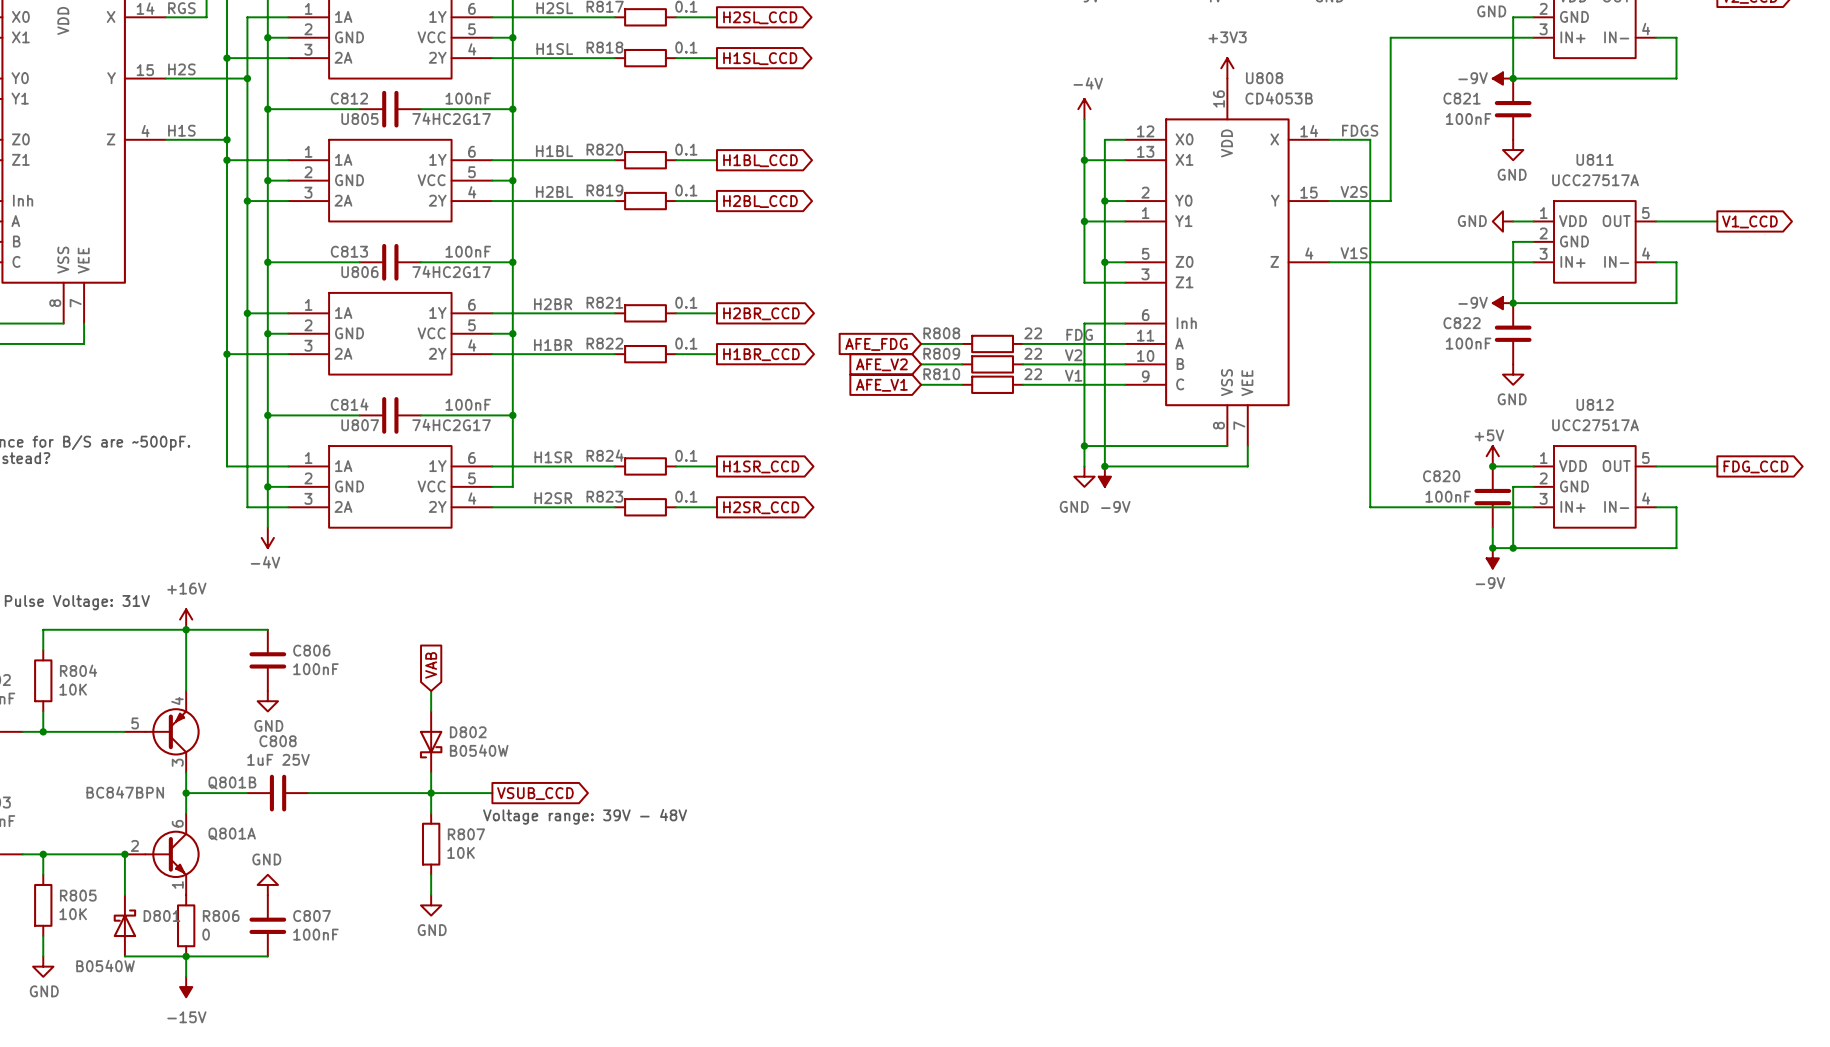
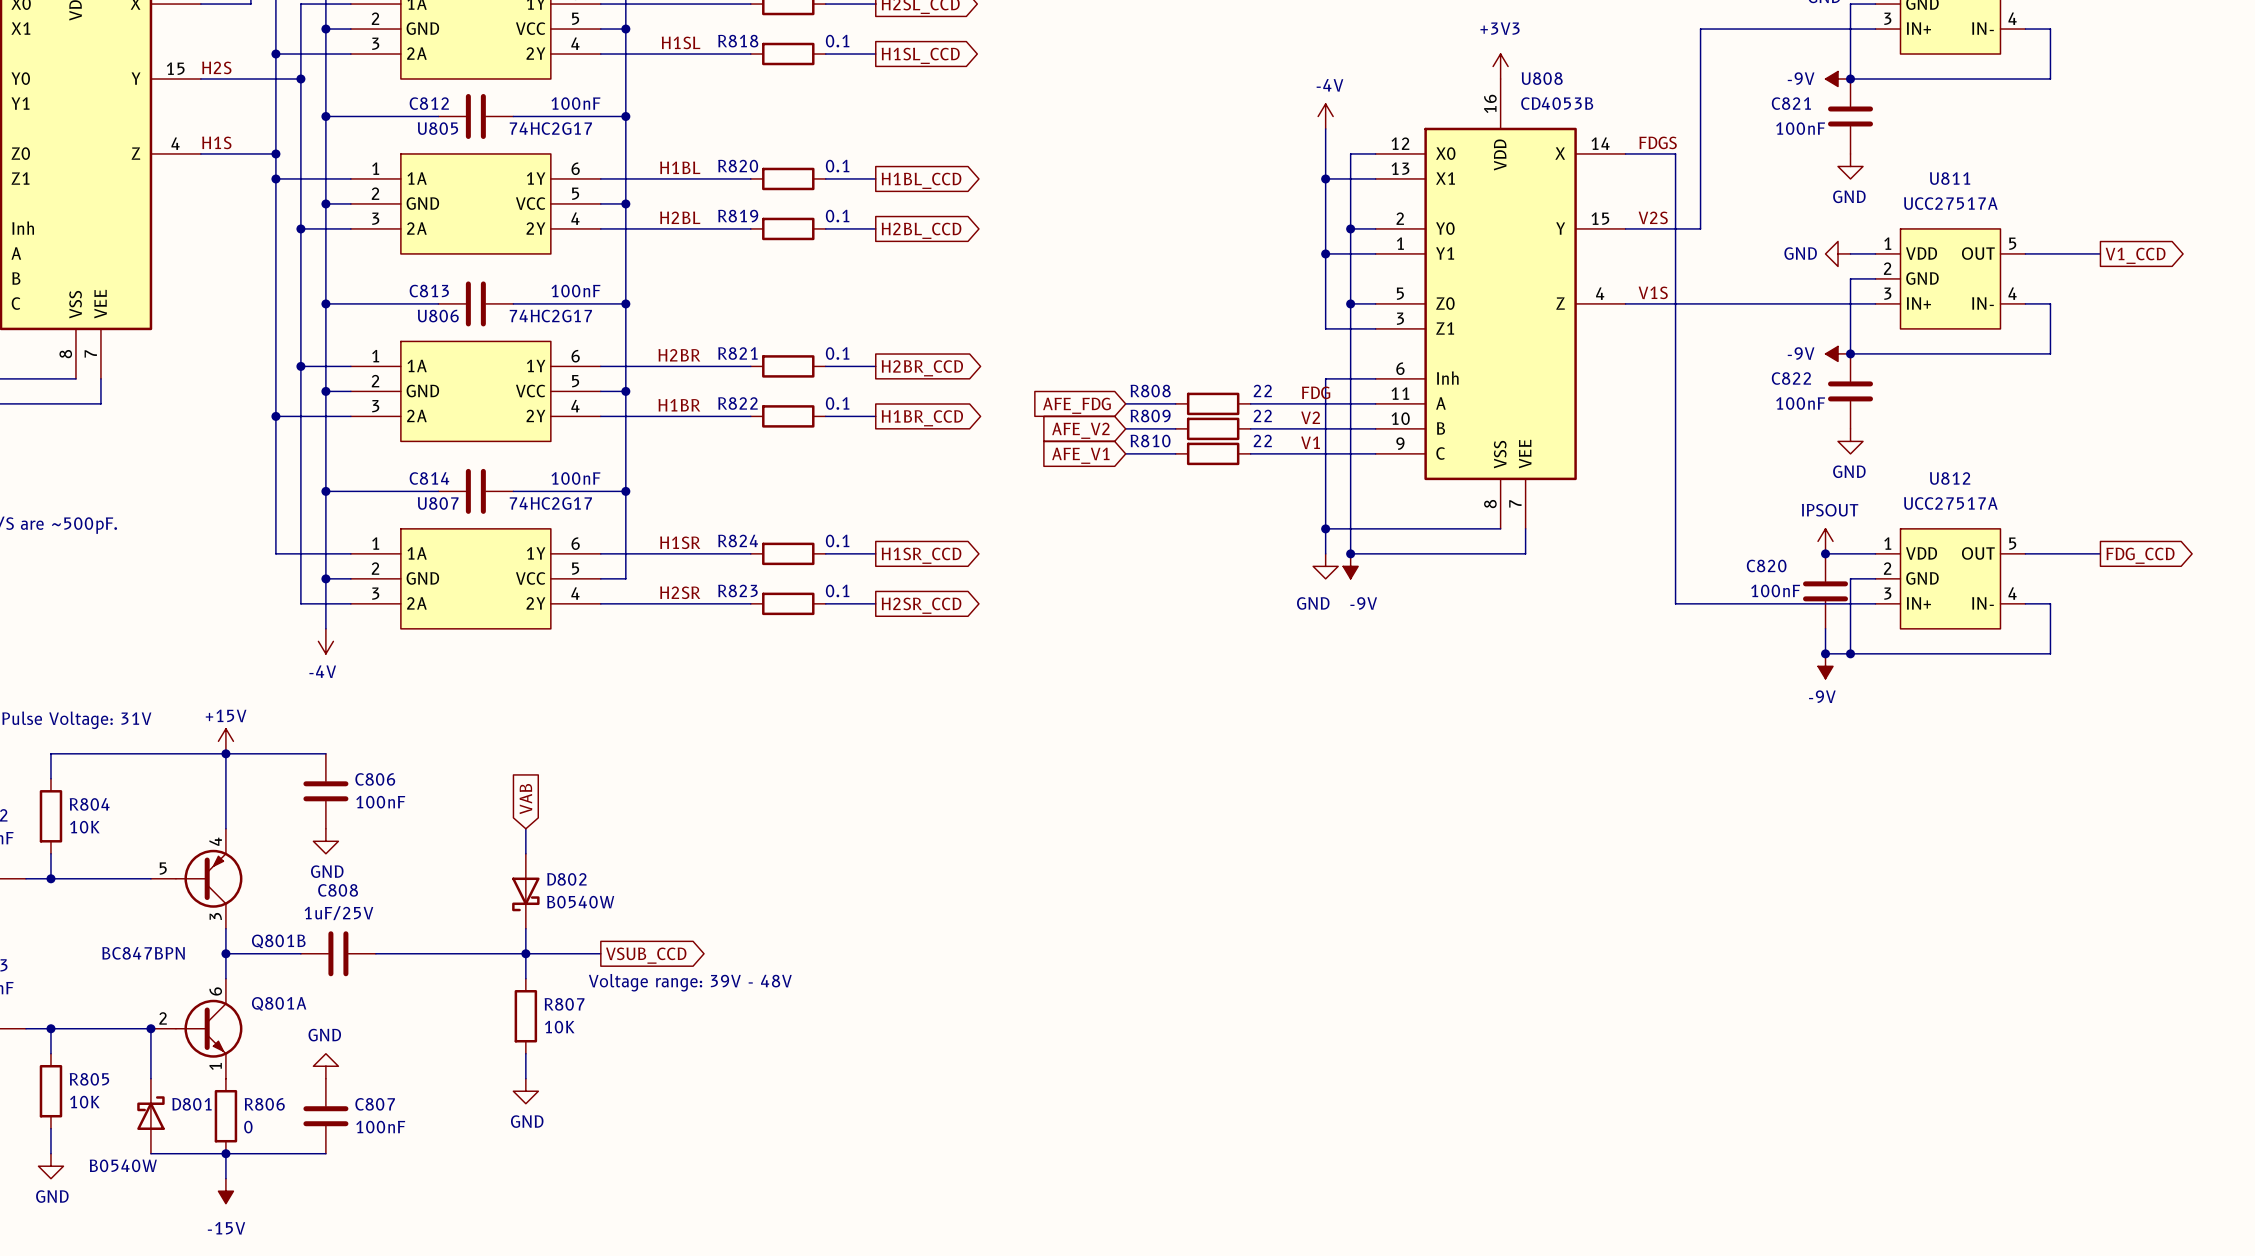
power symbol: +5V (1492, 456) -> IPSOUT (1825, 541)
power symbol: +16V (186, 619) -> +15V (225, 741)
C808 value: 1uF 25V (278, 759) -> 1uF/25V (338, 913)

